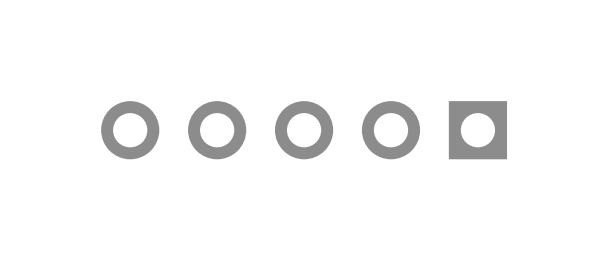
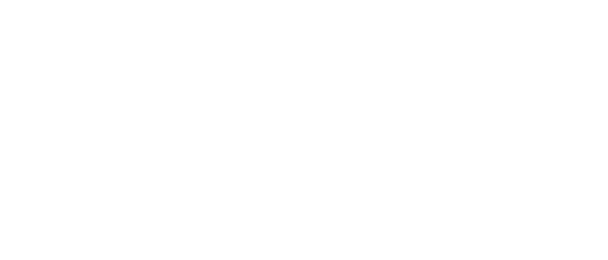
part: (304, 130) -> none

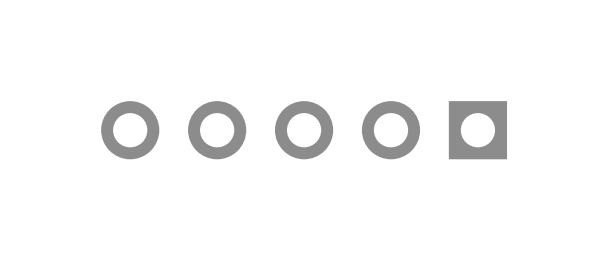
part: none -> (304, 130)

